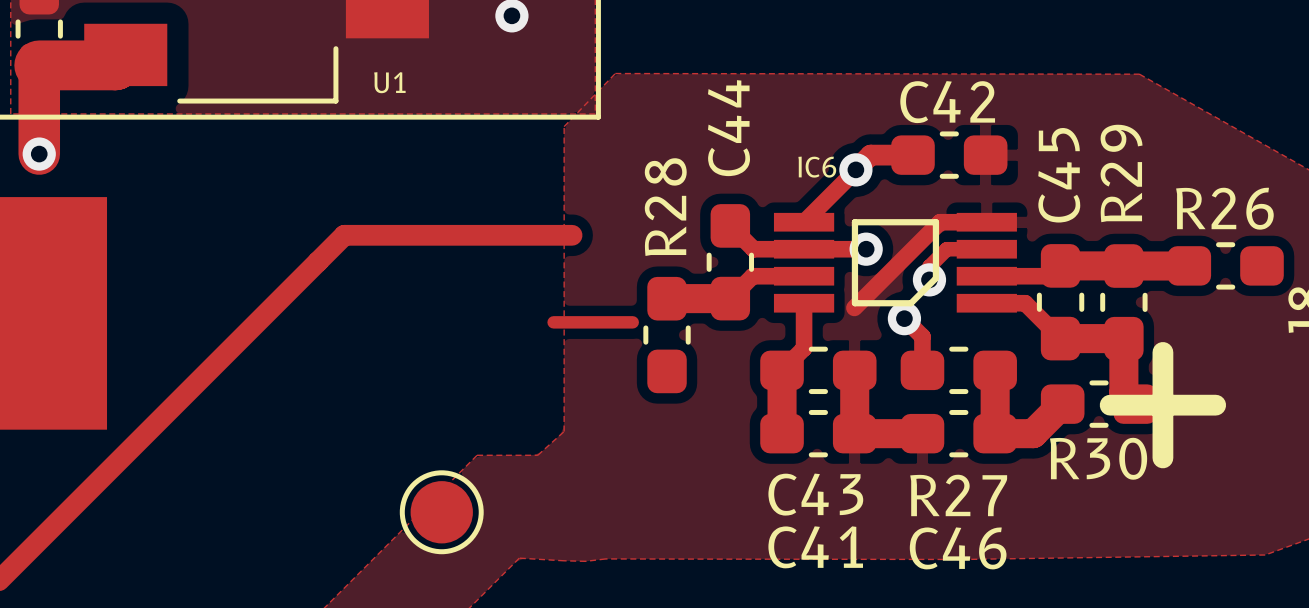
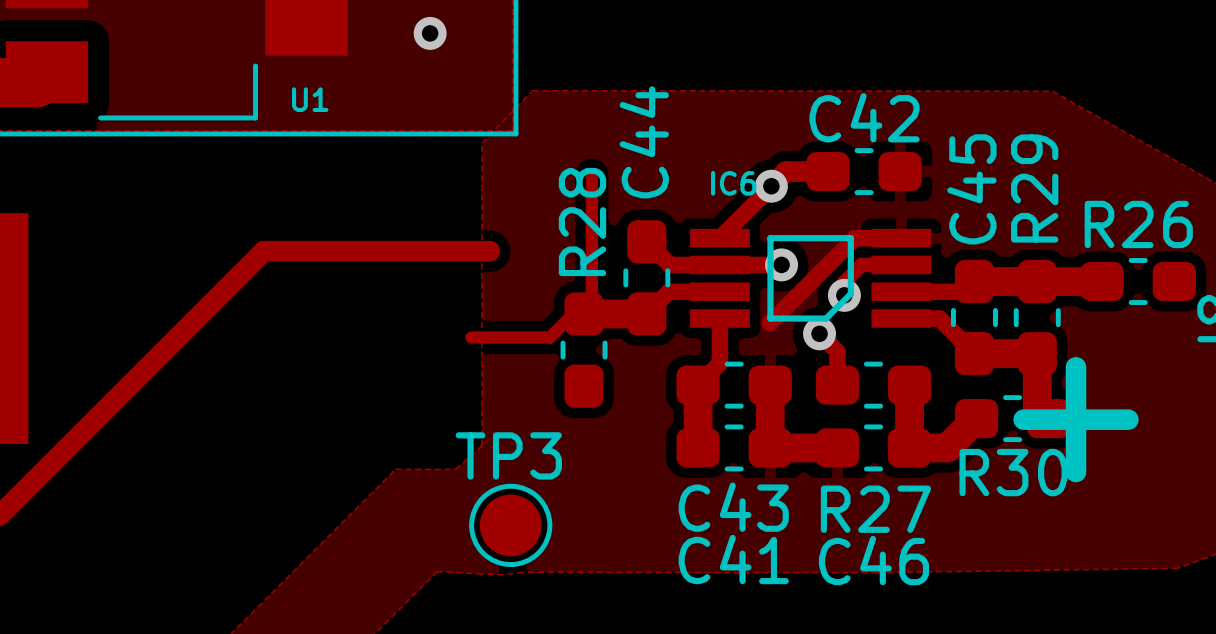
track: none -> (591, 175) (591, 295) (549, 337)
TP3: none -> (510, 525)
part: (441, 512) -> none

